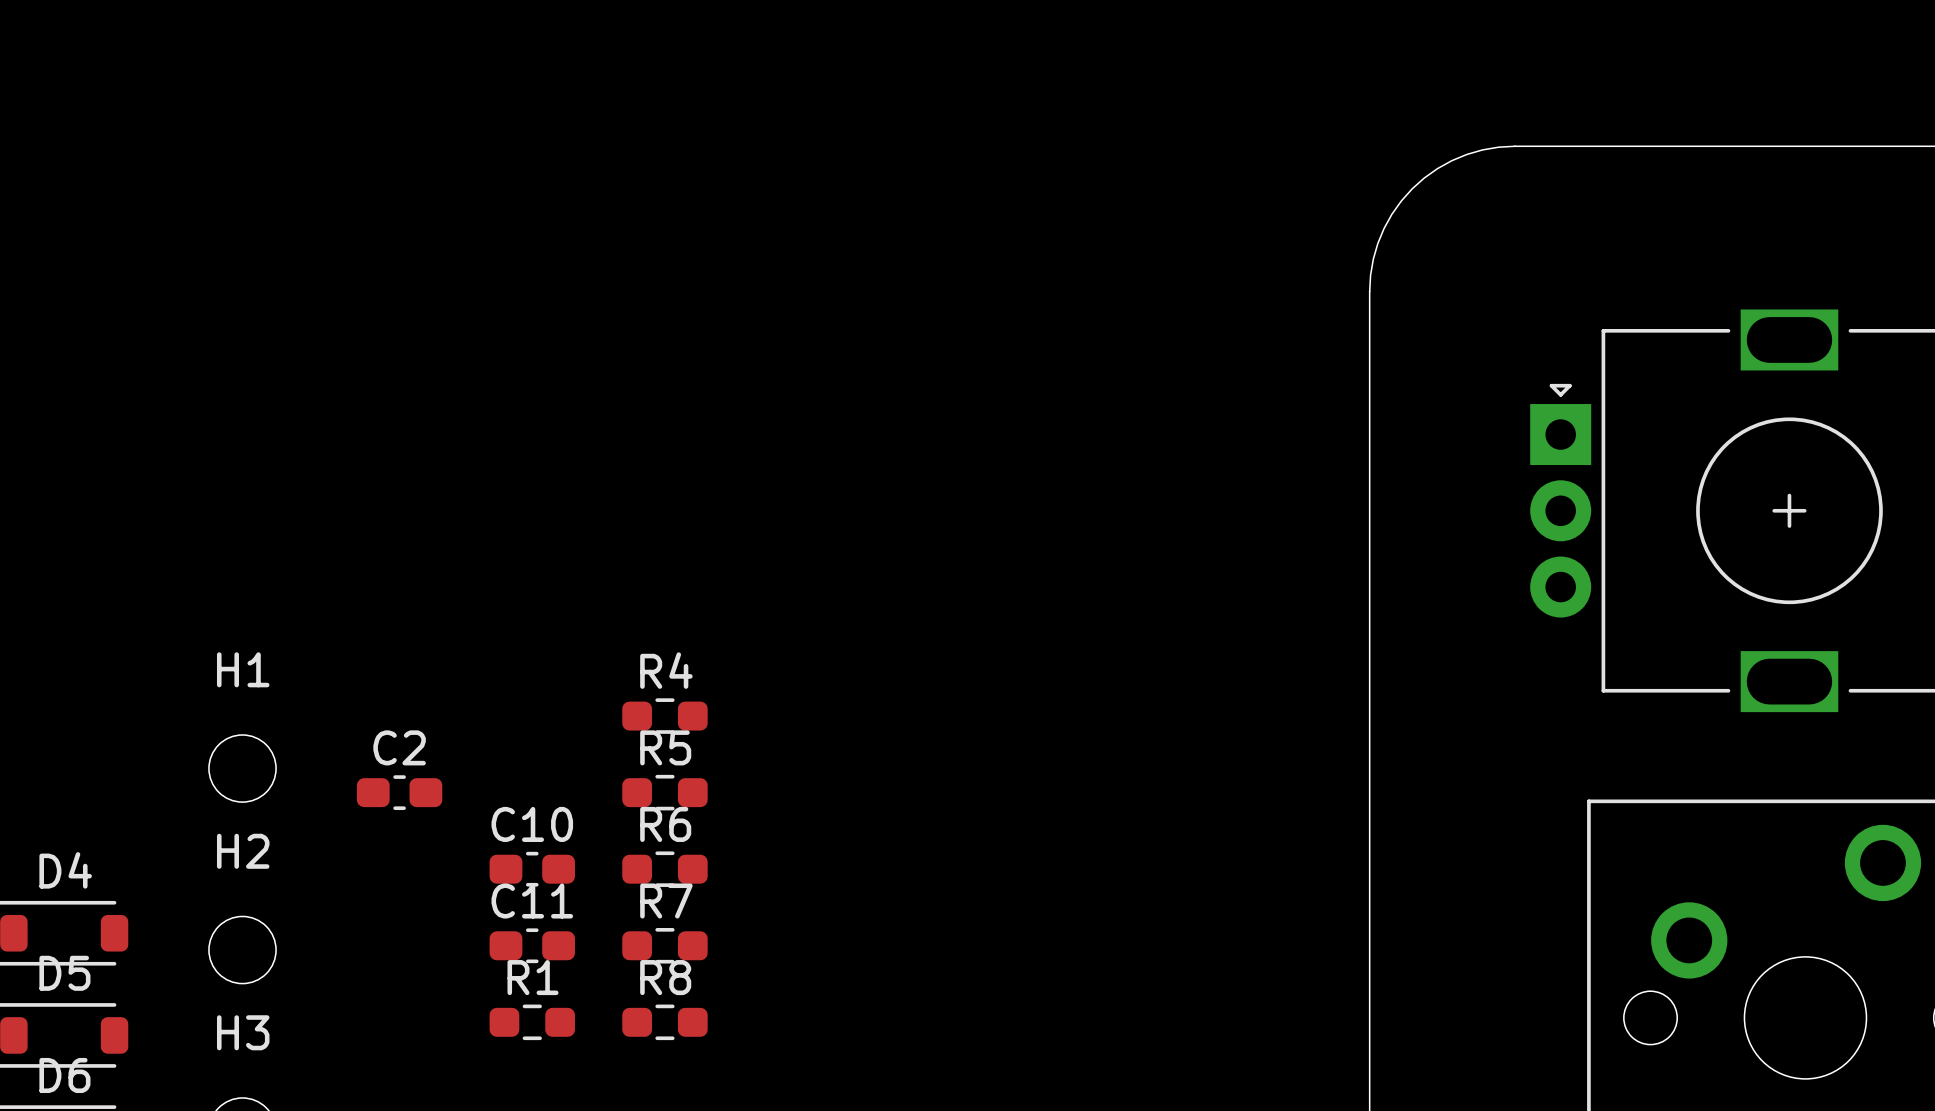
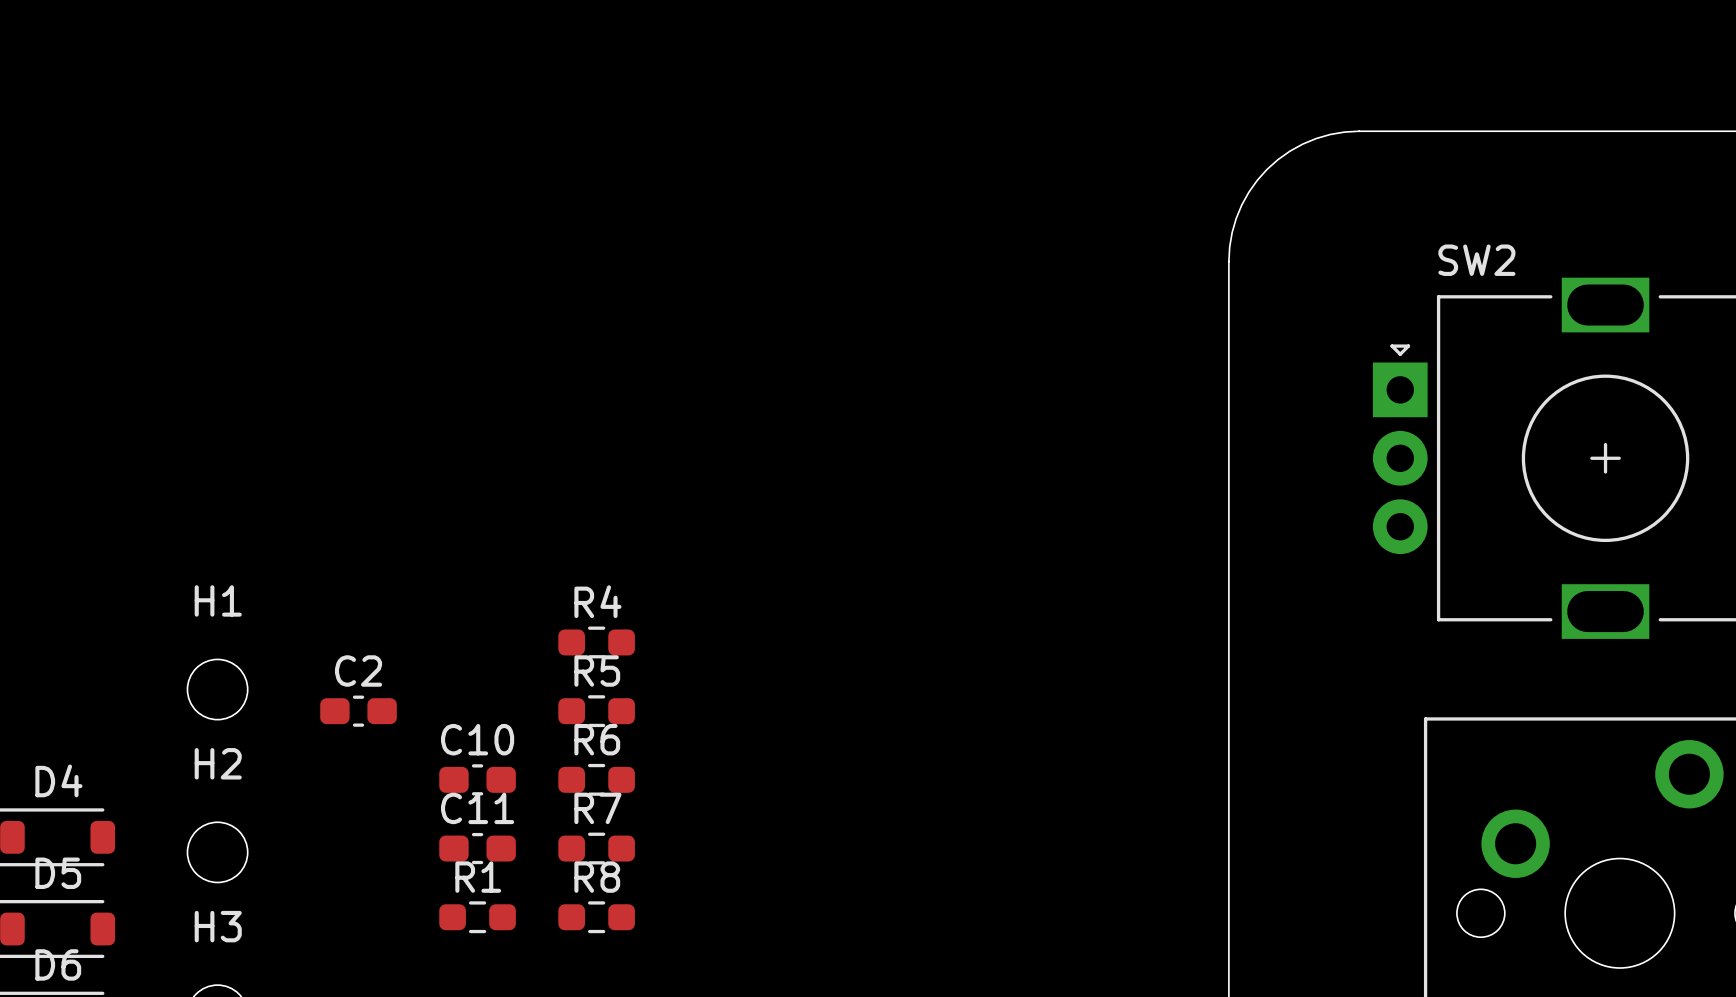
SW2 name: none -> SW2 (1476, 260)

